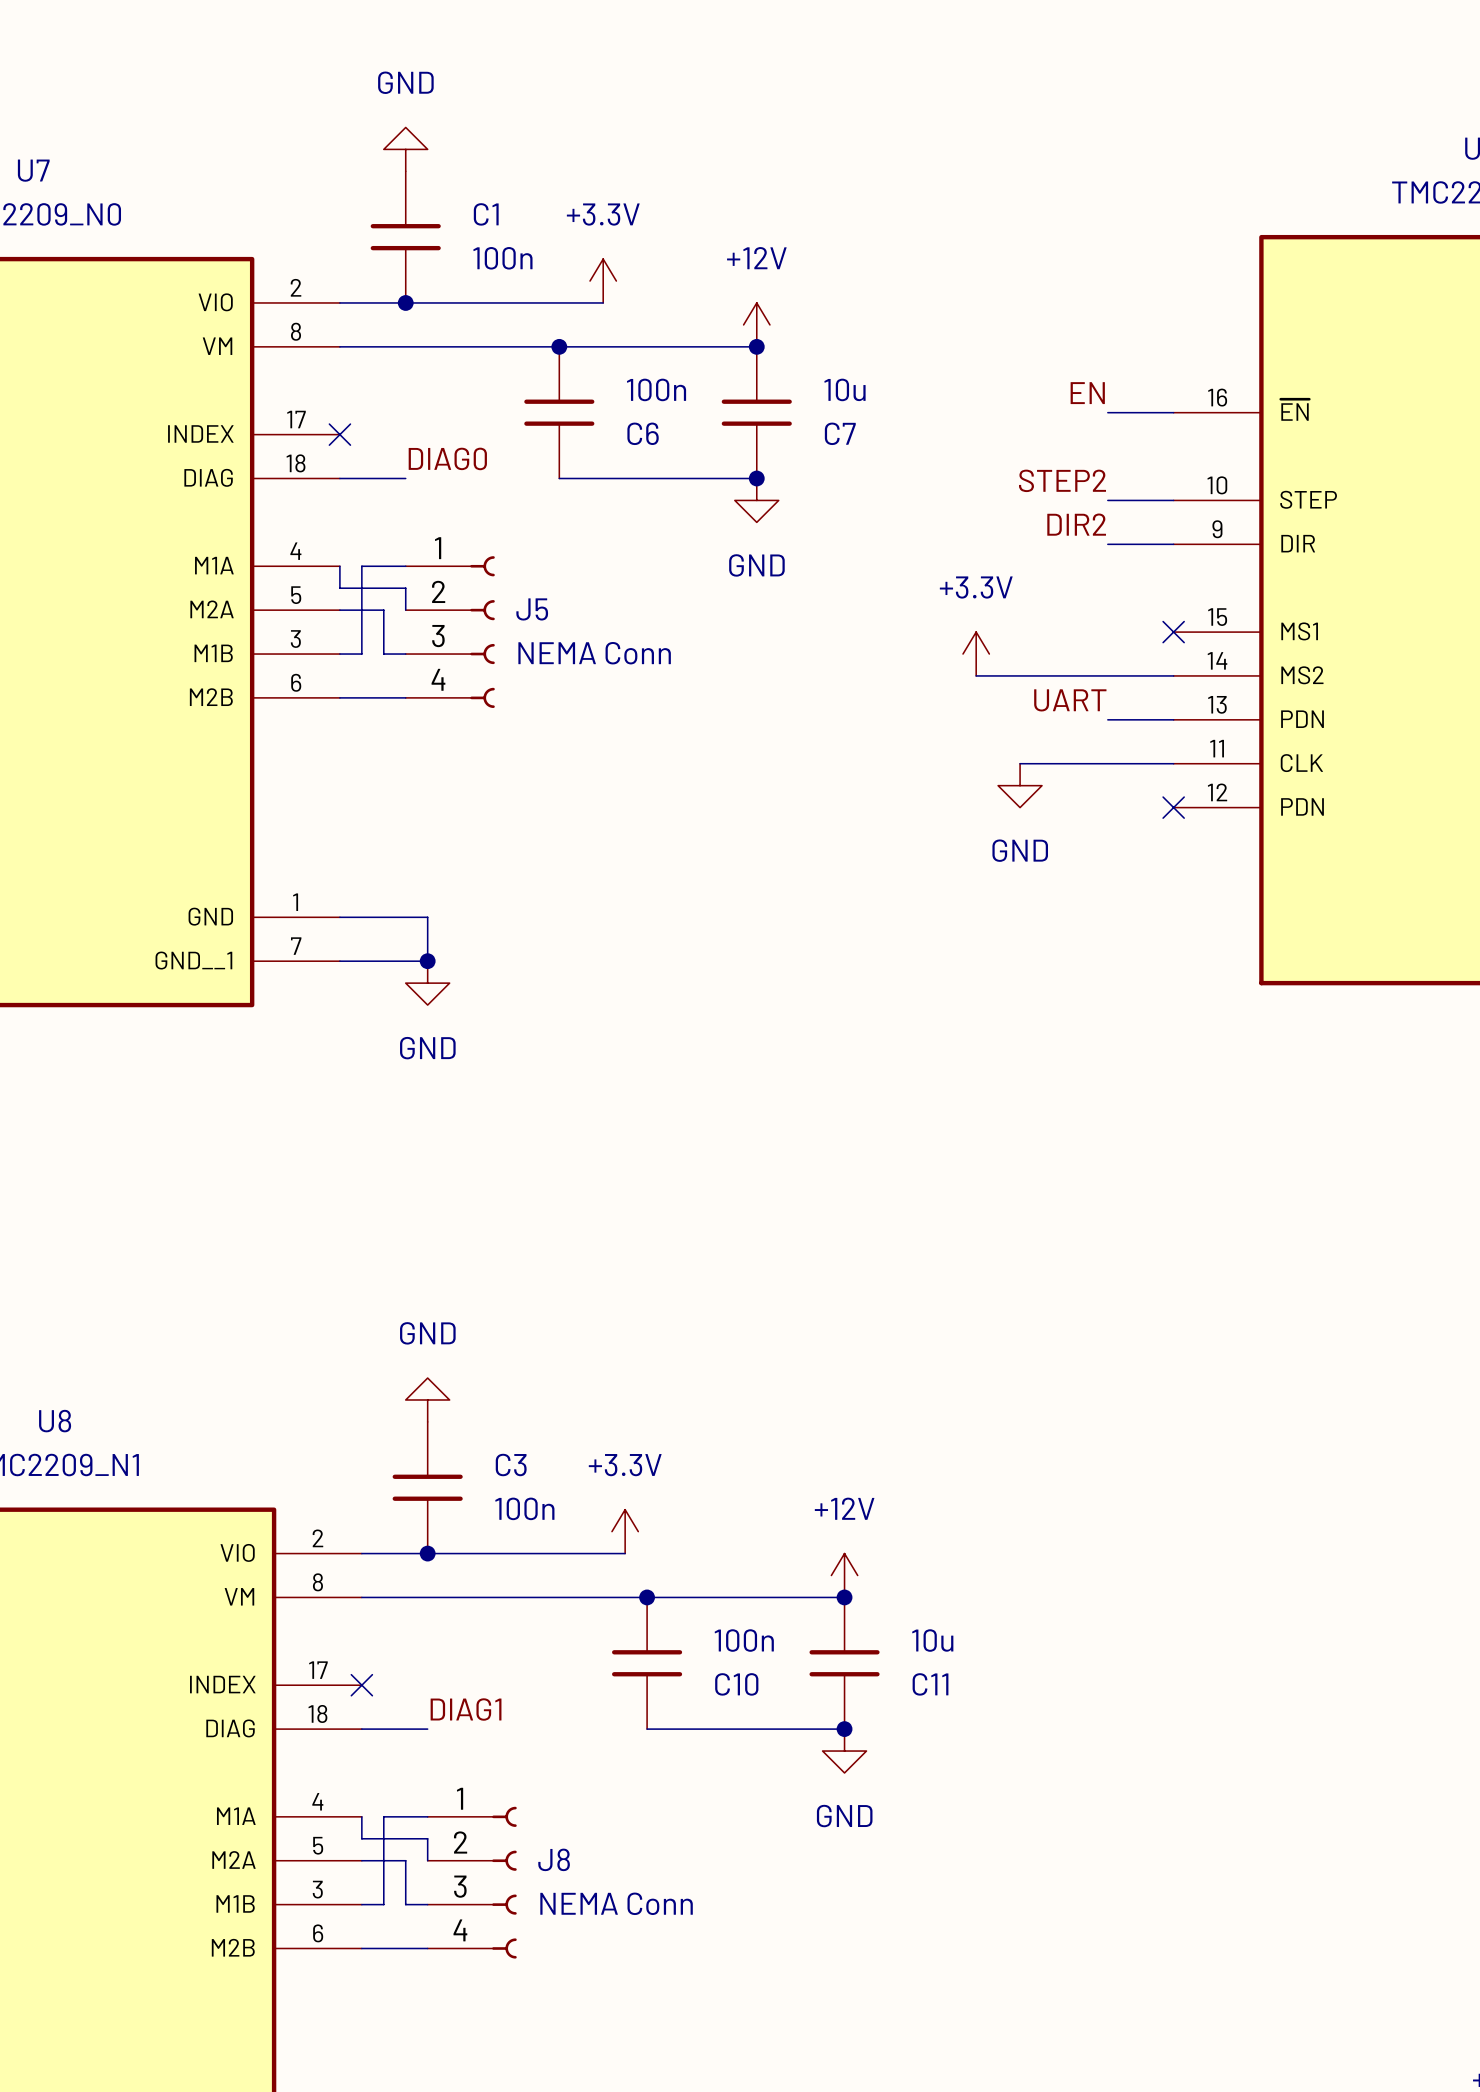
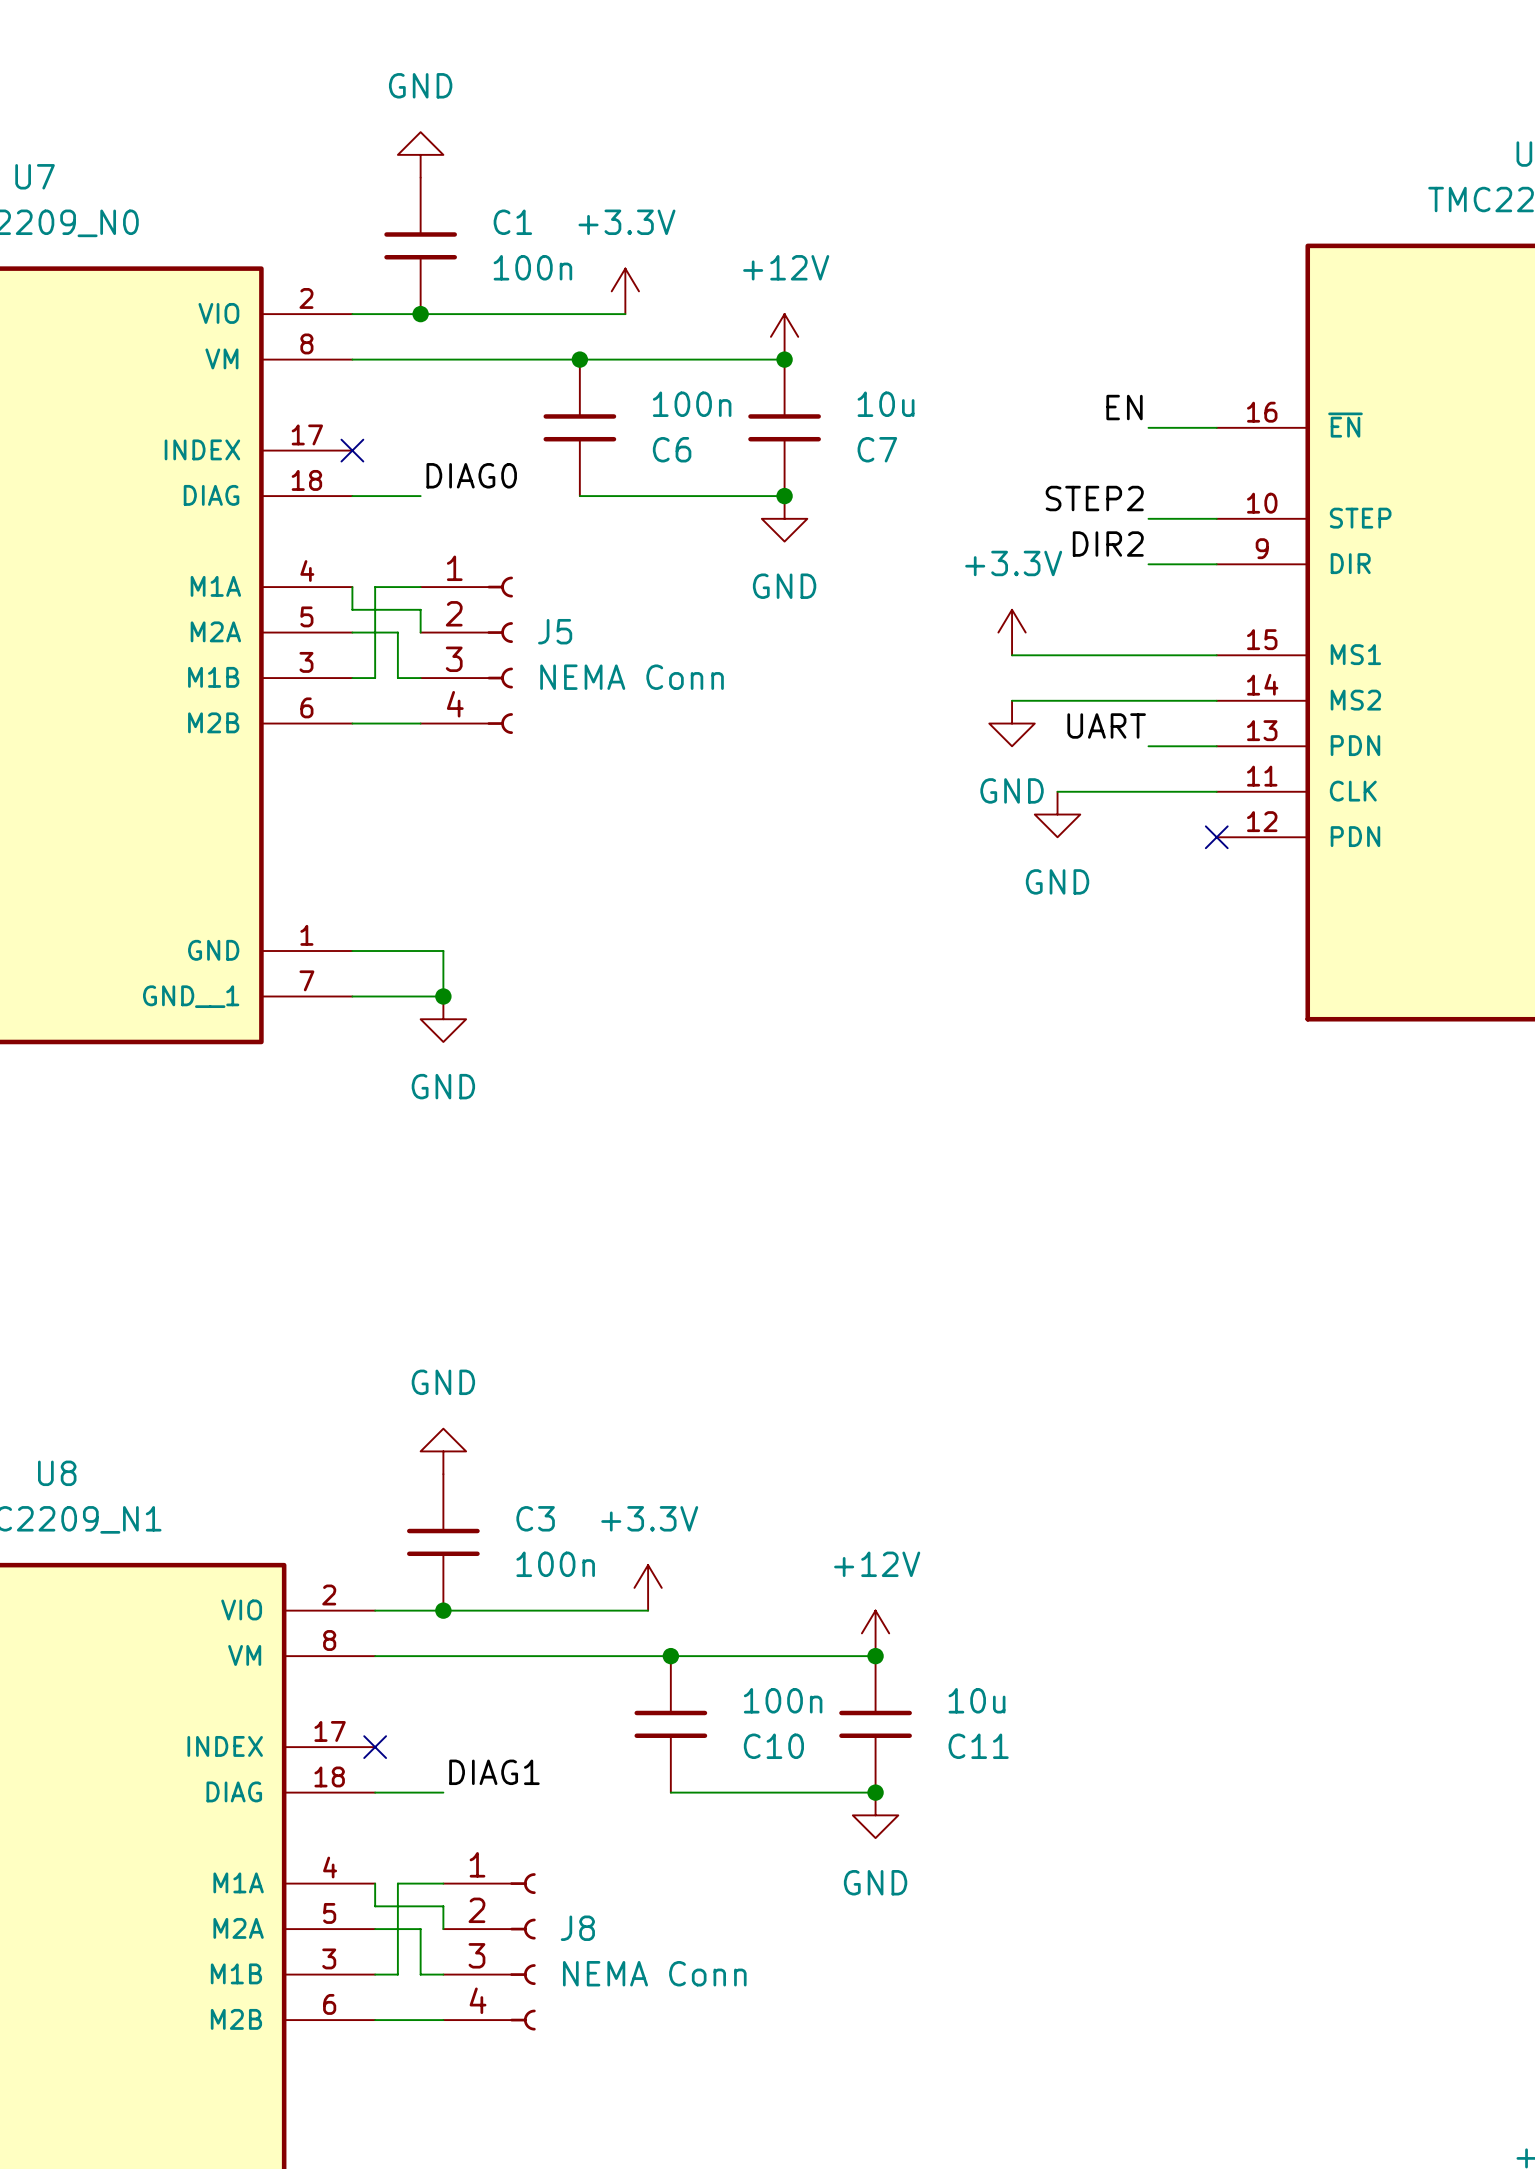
wire: none -> (1012, 655) (1216, 655)
no-connect mark: (1173, 632) -> none
power symbol position: +3.3V (976, 654) -> +3.3V (1012, 632)
power symbol: none -> GND (1012, 723)

